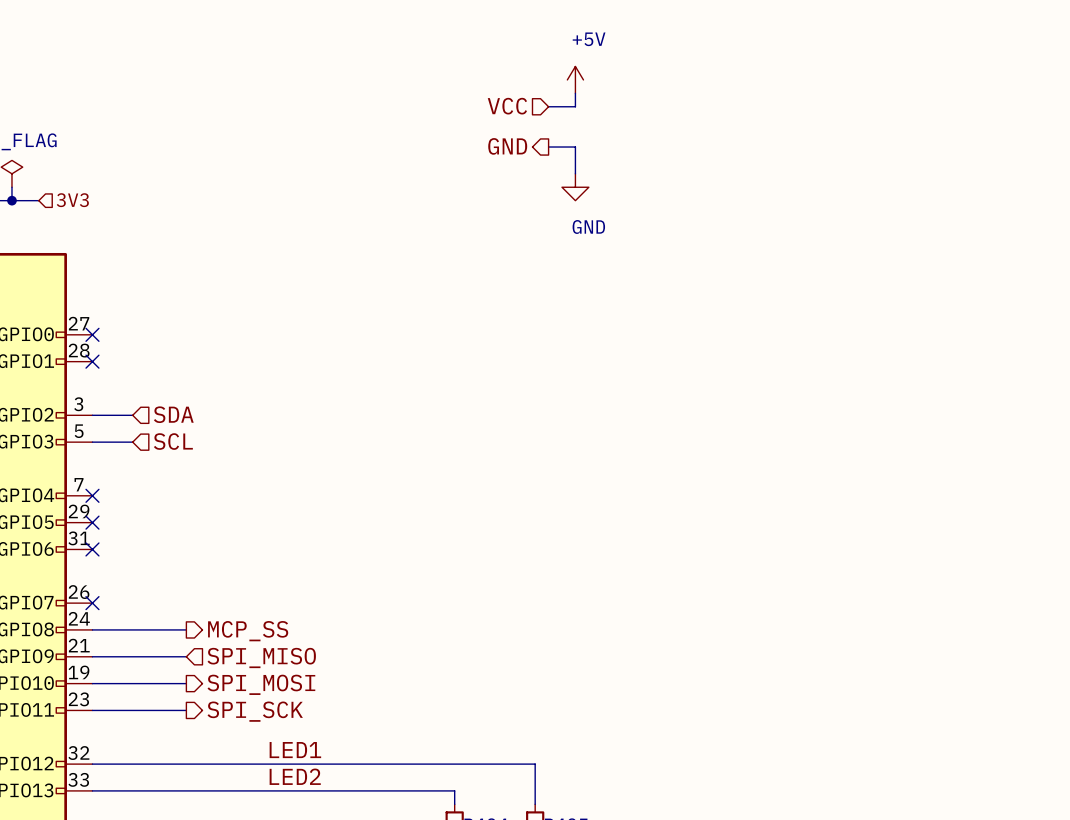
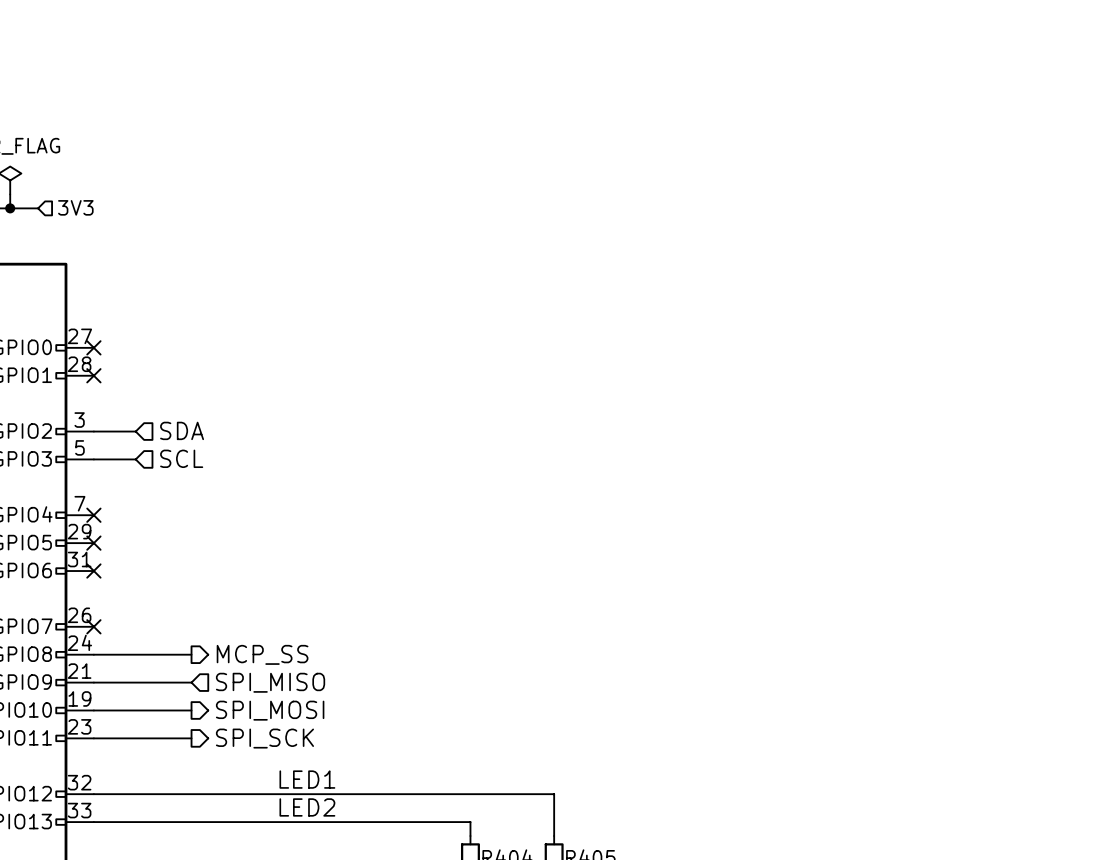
power symbol: +5V (575, 79) -> none
wire: (575, 93) (575, 106) (548, 106) -> none
hierarchical label: VCC (507, 106) -> none
hierarchical label: GND (507, 146) -> none
wire: (548, 147) (575, 147) (575, 173) -> none
power symbol: GND (575, 187) -> none

